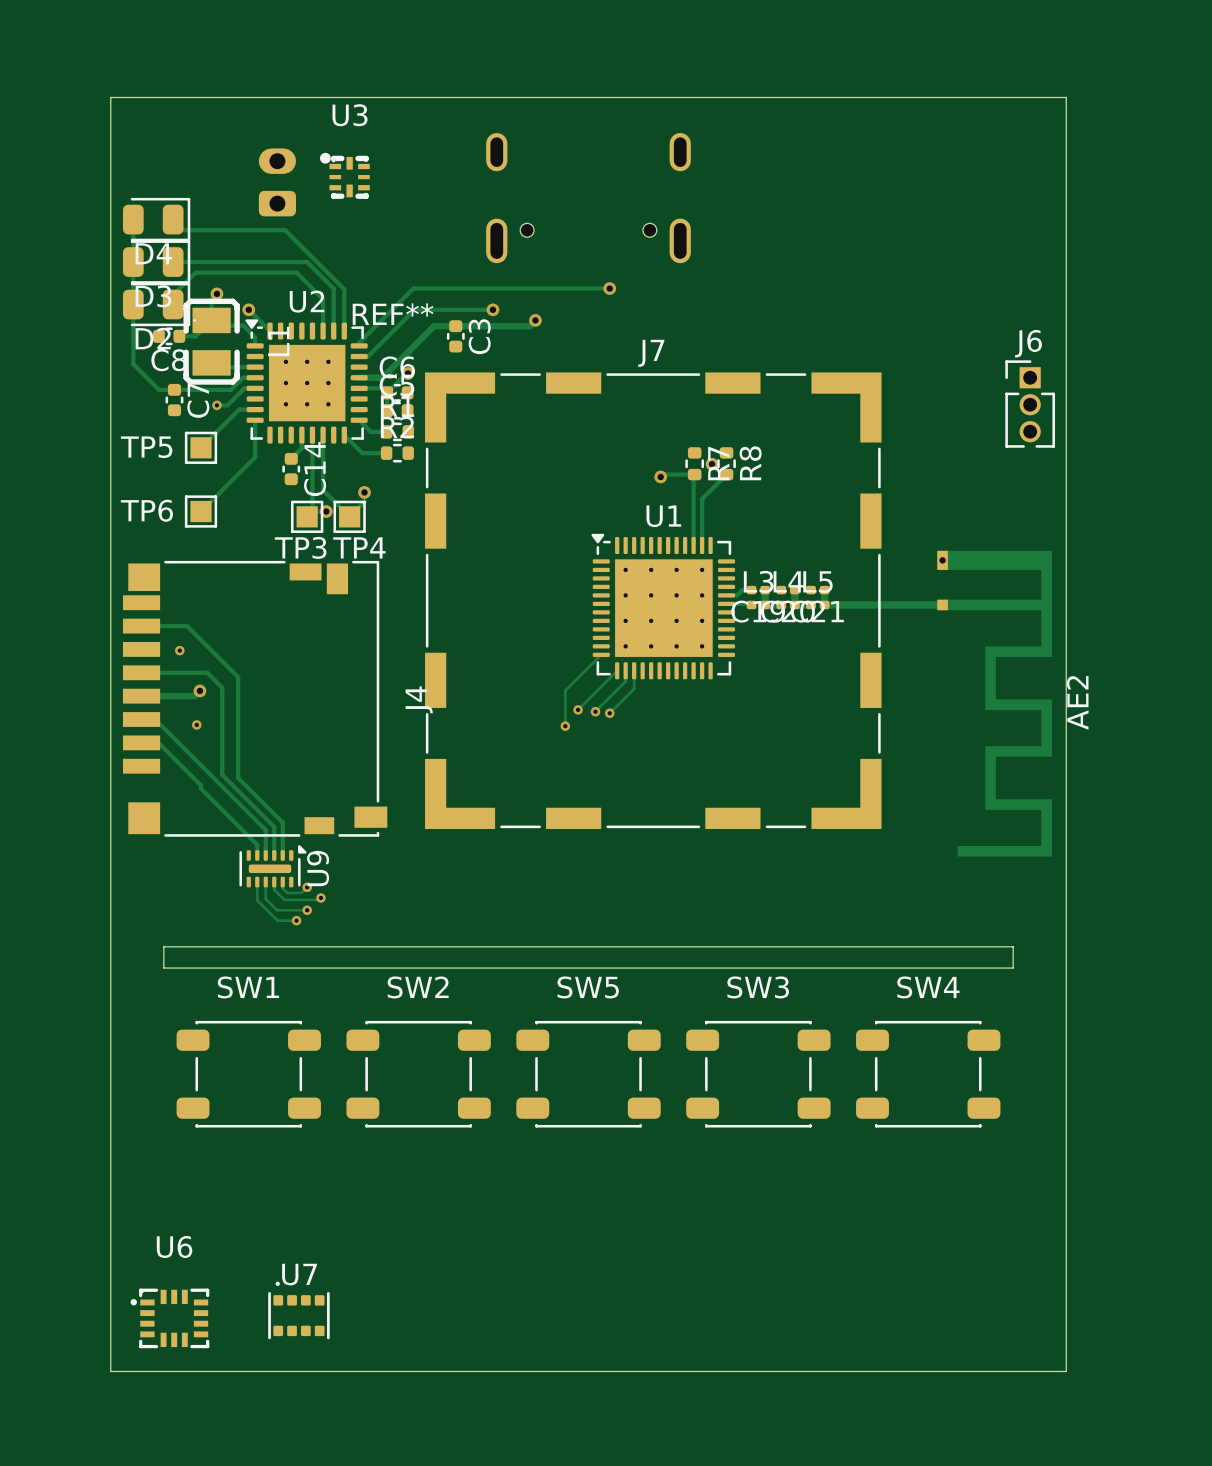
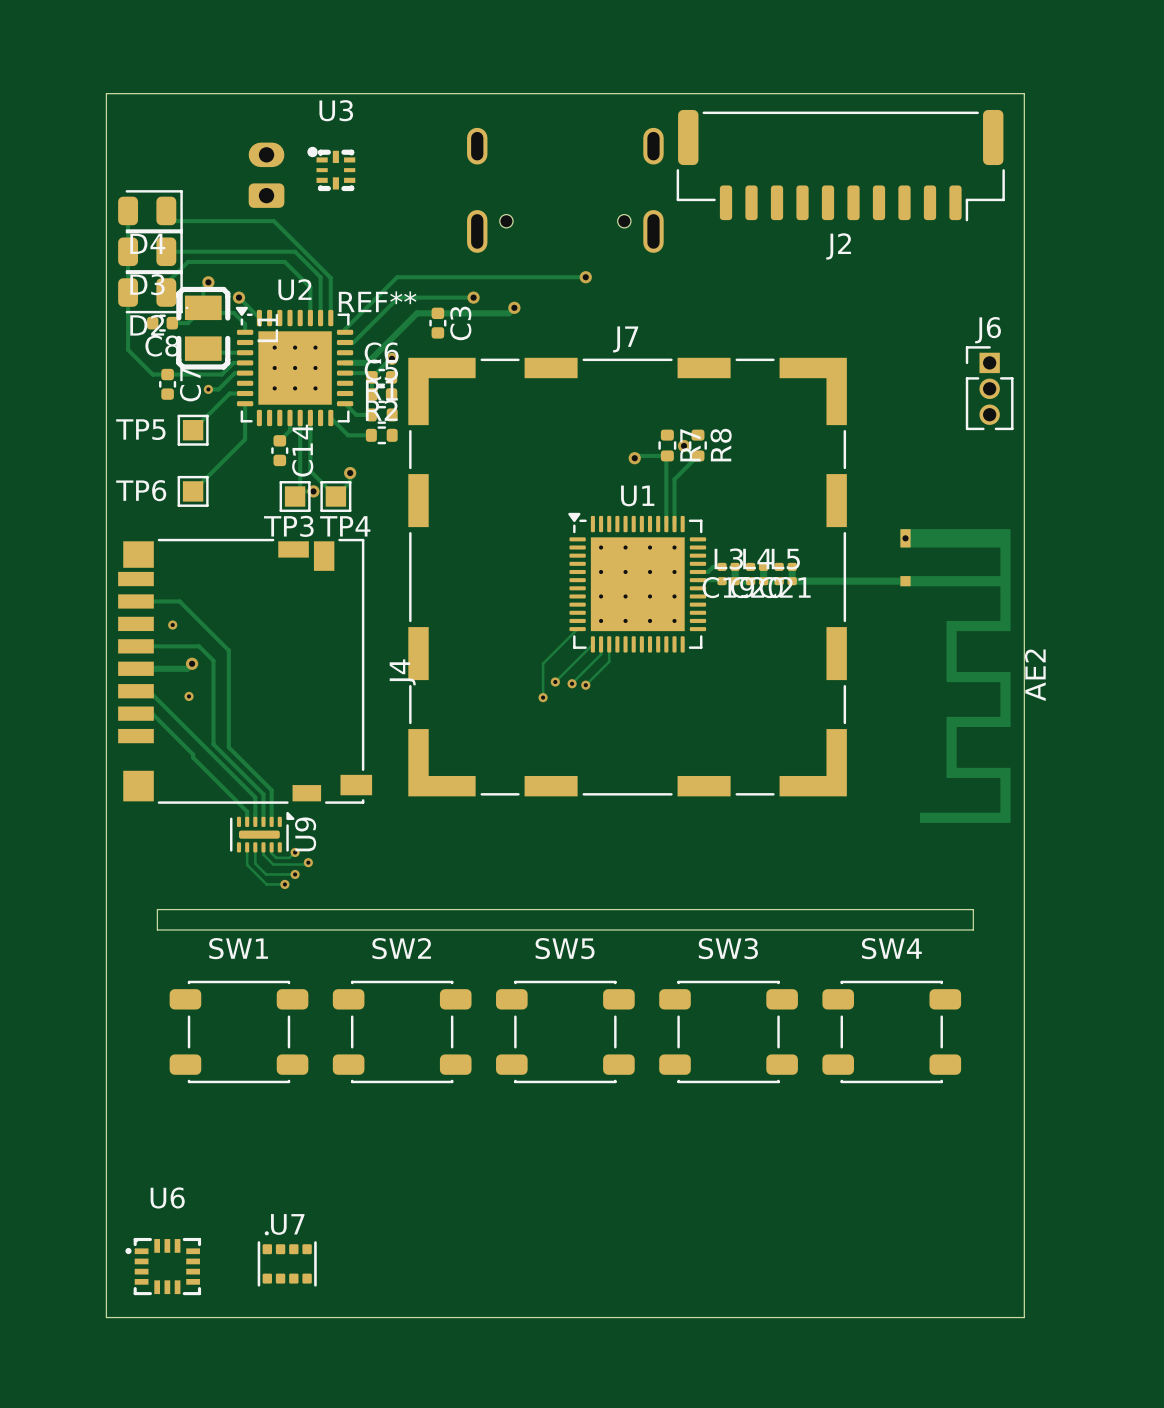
J2: none -> (840, 165)

